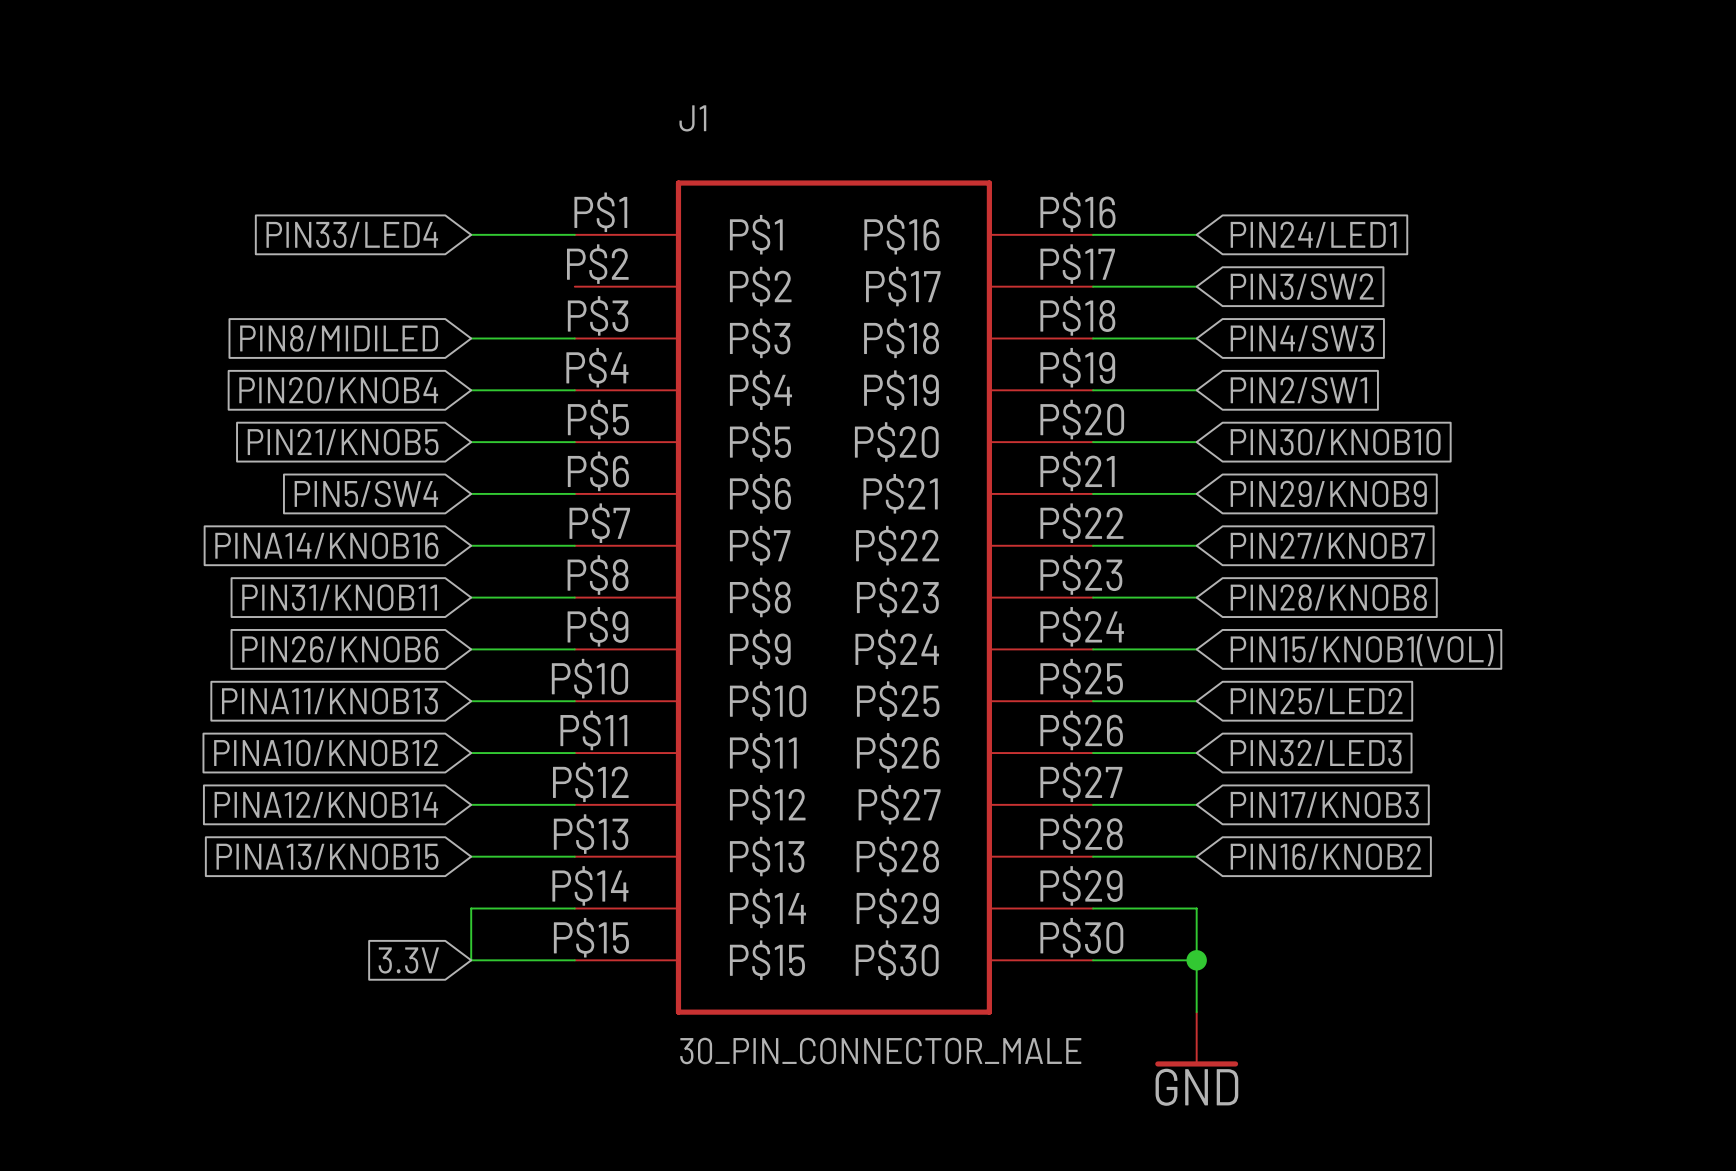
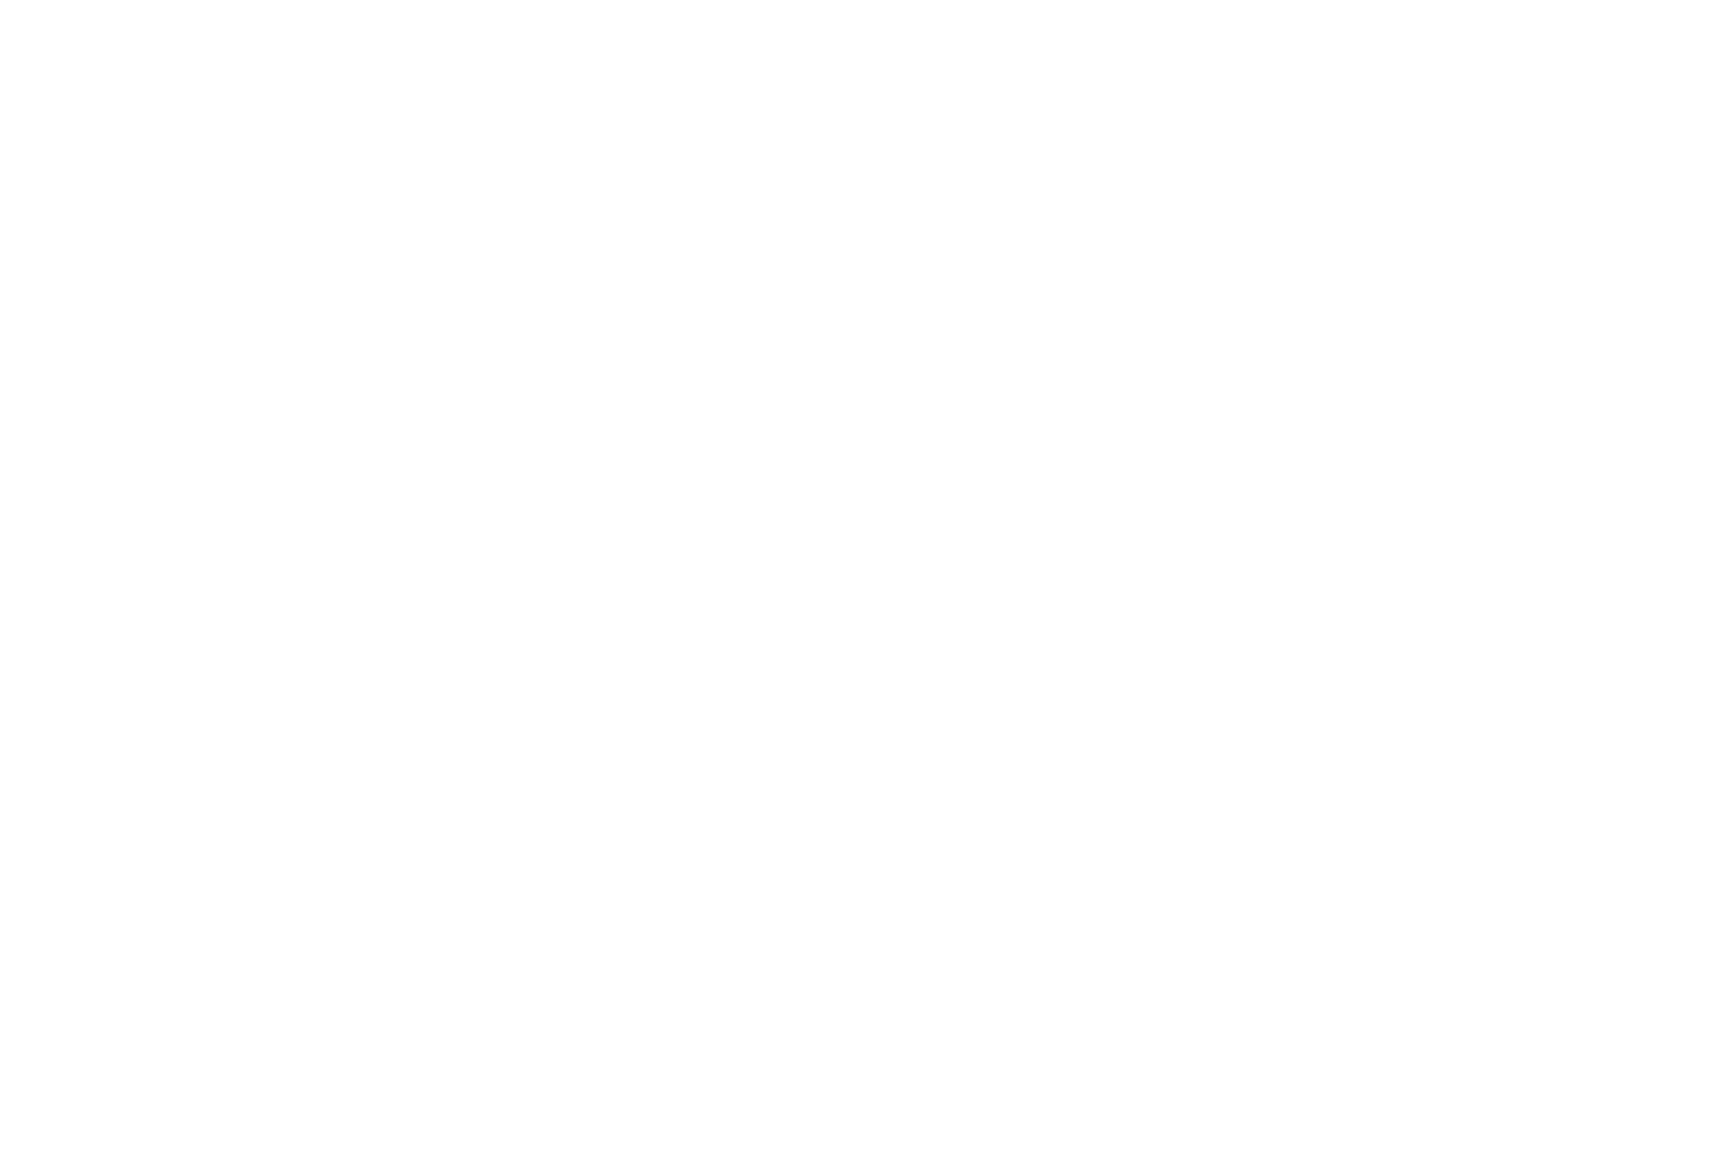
global label: PIN33/LED4 (352, 234) -> none
wire: (471, 234) (574, 234) -> none
wire: (1093, 234) (1196, 234) -> none
global label: PIN24/LED1 (1313, 234) -> none
wire: (1093, 286) (1196, 286) -> none
global label: PIN3/SW2 (1302, 286) -> none
global label: PIN8/MIDILED (339, 338) -> none
wire: (471, 338) (574, 338) -> none
wire: (1093, 338) (1196, 338) -> none
global label: PIN4/SW3 (1302, 338) -> none
global label: PIN20/KNOB4 (338, 390) -> none
wire: (471, 390) (574, 390) -> none
wire: (1093, 390) (1196, 390) -> none
global label: PIN2/SW1 (1298, 390) -> none
global label: PIN21/KNOB5 (343, 442) -> none
wire: (471, 442) (574, 442) -> none
wire: (1093, 442) (1196, 442) -> none
global label: PIN30/KNOB10 (1335, 442) -> none
global label: PIN5/SW4 (366, 493) -> none
wire: (471, 493) (574, 493) -> none
wire: (1093, 493) (1196, 493) -> none
global label: PIN29/KNOB9 (1328, 493) -> none
global label: PINA14/KNOB16 (326, 545) -> none
wire: (471, 545) (574, 545) -> none
wire: (1093, 545) (1196, 545) -> none
global label: PIN27/KNOB7 (1327, 545) -> none
global label: PIN31/KNOB11 (339, 597) -> none
wire: (471, 597) (574, 597) -> none
J1: 30_PIN_CONNECTOR_MALE (833, 597) -> none
wire: (1093, 597) (1196, 597) -> none
global label: PIN28/KNOB8 (1328, 597) -> none
global label: PIN26/KNOB6 (340, 649) -> none
wire: (471, 649) (574, 649) -> none
wire: (1093, 649) (1196, 649) -> none
global label: PIN15/KNOB1(VOL) (1362, 650) -> none
global label: PINA11/KNOB13 (329, 701) -> none
wire: (471, 701) (574, 701) -> none
wire: (1093, 701) (1196, 701) -> none
global label: PIN25/LED2 (1316, 701) -> none
global label: PINA10/KNOB12 (326, 753) -> none
wire: (471, 753) (574, 753) -> none
wire: (1093, 753) (1196, 753) -> none
global label: PIN32/LED3 (1316, 753) -> none
global label: PINA12/KNOB14 (326, 804) -> none
wire: (471, 804) (574, 804) -> none
wire: (1093, 804) (1196, 804) -> none
global label: PIN17/KNOB3 (1324, 804) -> none
global label: PINA13/KNOB15 (327, 856) -> none
wire: (471, 856) (574, 856) -> none
wire: (1093, 856) (1196, 856) -> none
global label: PIN16/KNOB2 (1325, 856) -> none
wire: (574, 908) (471, 908) (471, 960) (574, 960) -> none
wire: (1093, 908) (1196, 908) (1196, 1012) -> none
global label: 3.3V (408, 960) -> none
wire: (1093, 960) (1196, 960) -> none
junction: (1196, 960) -> none
power symbol: GND (1196, 1039) -> none

